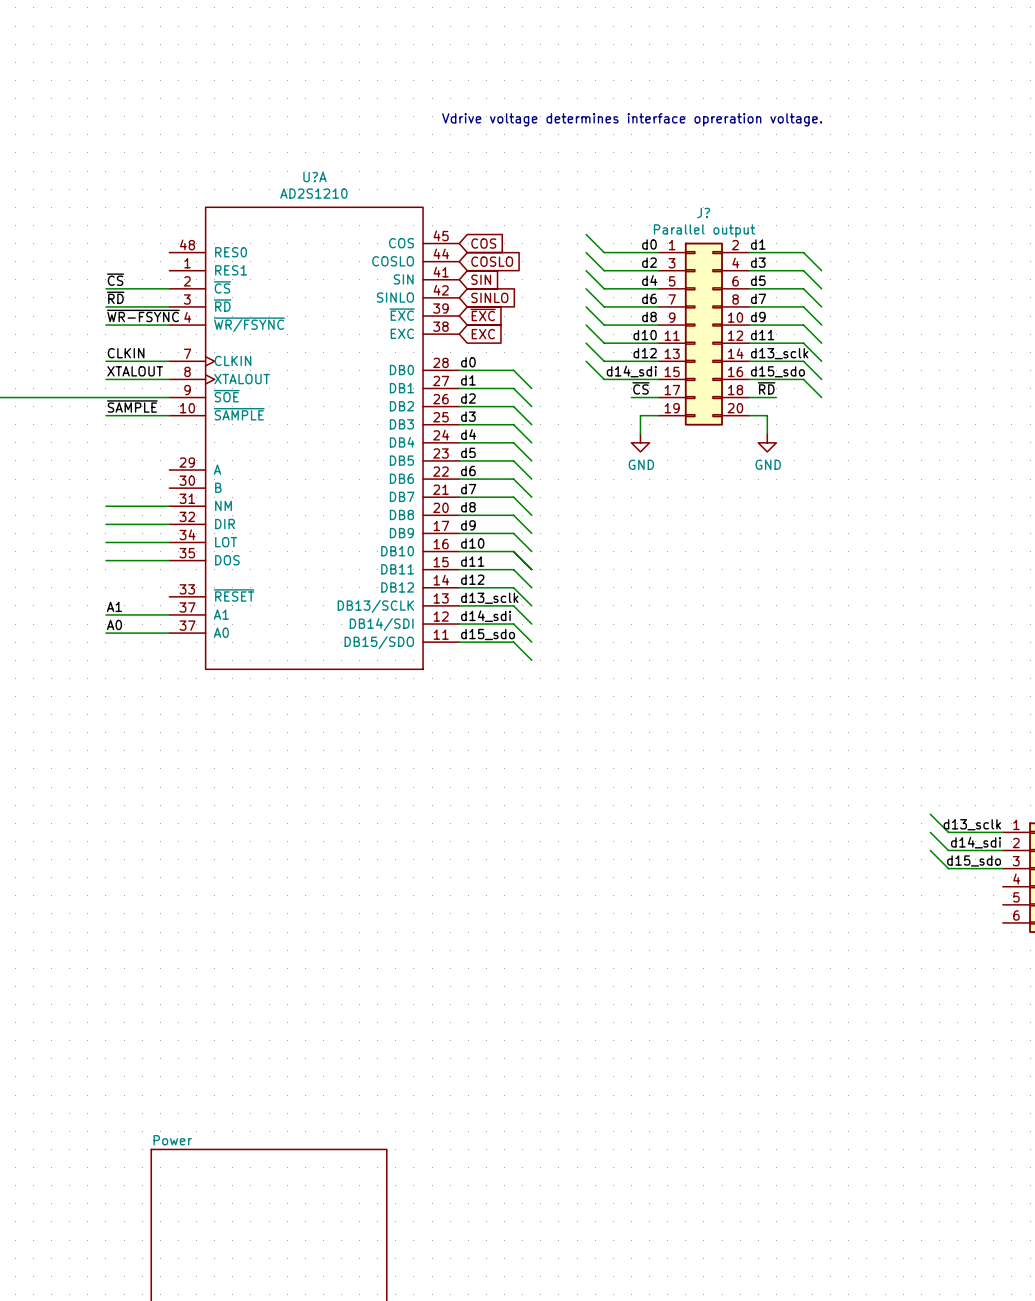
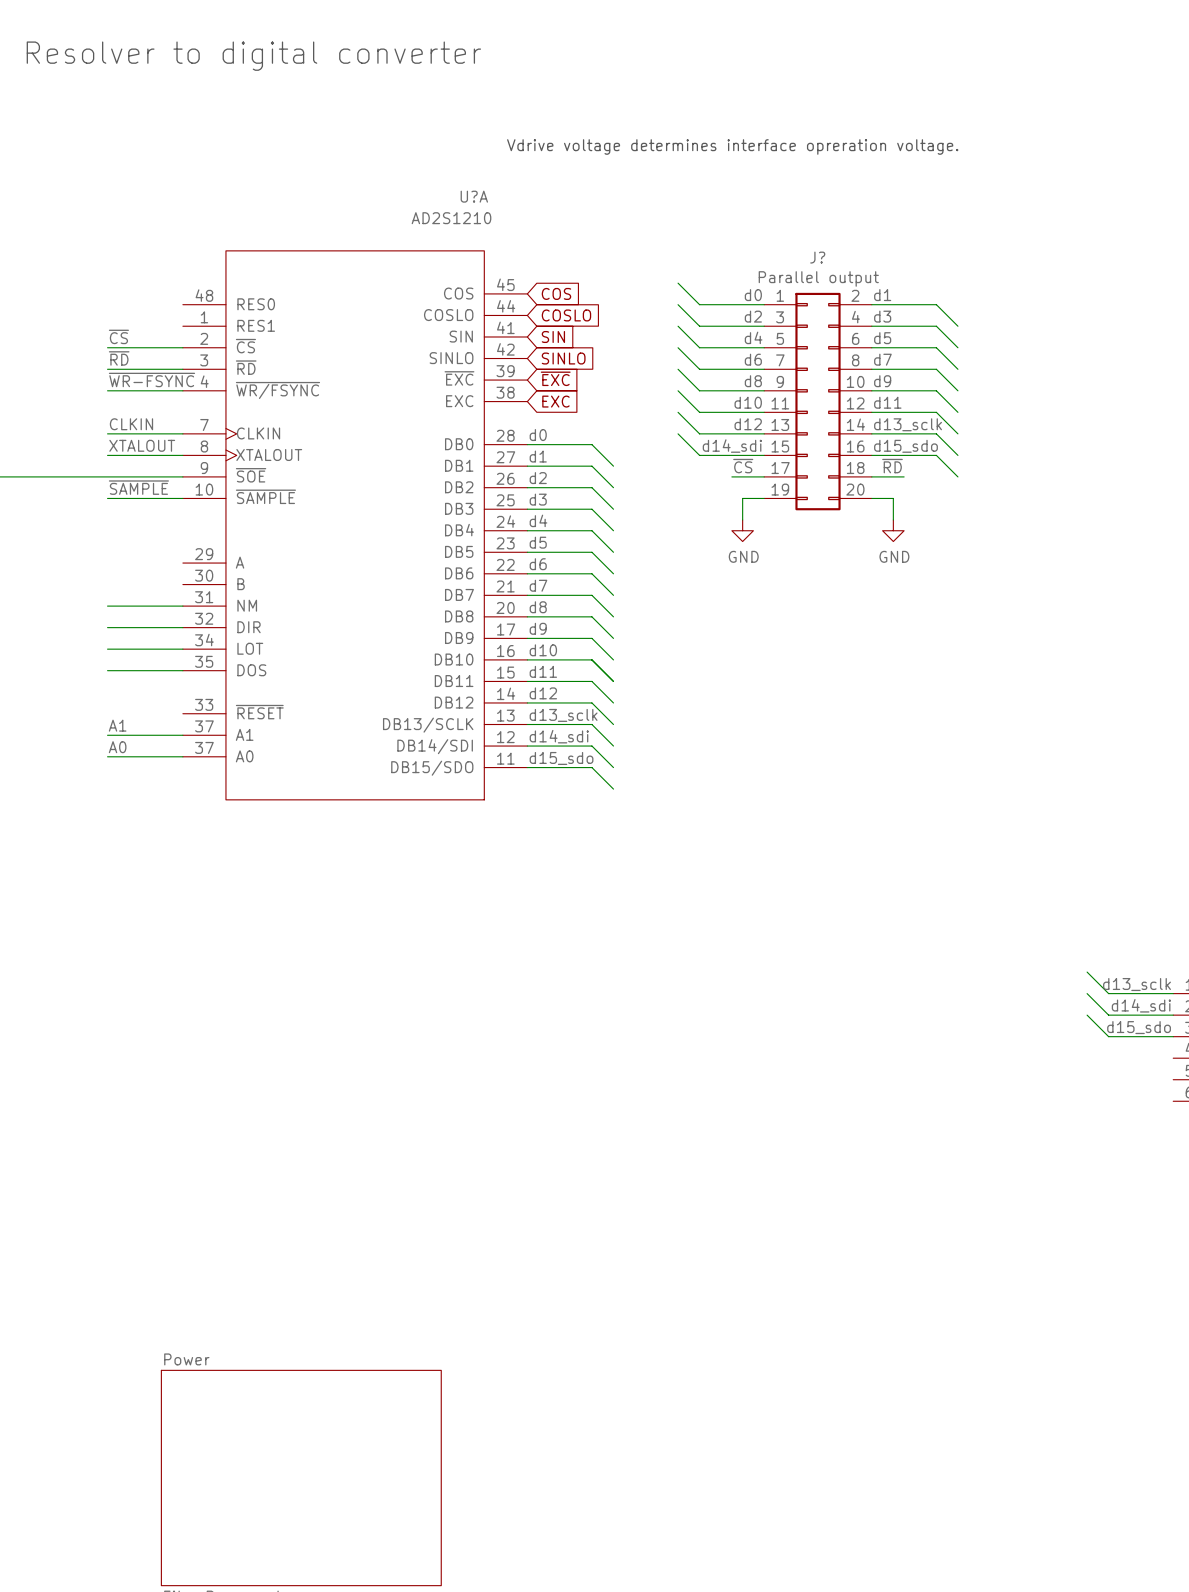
text: none -> Resolver to digital converter (253, 56)
U?A name position: U?A (314, 177) -> U?A (474, 196)
U?A value position: AD2S1210 (313, 193) -> AD2S1210 (451, 218)

